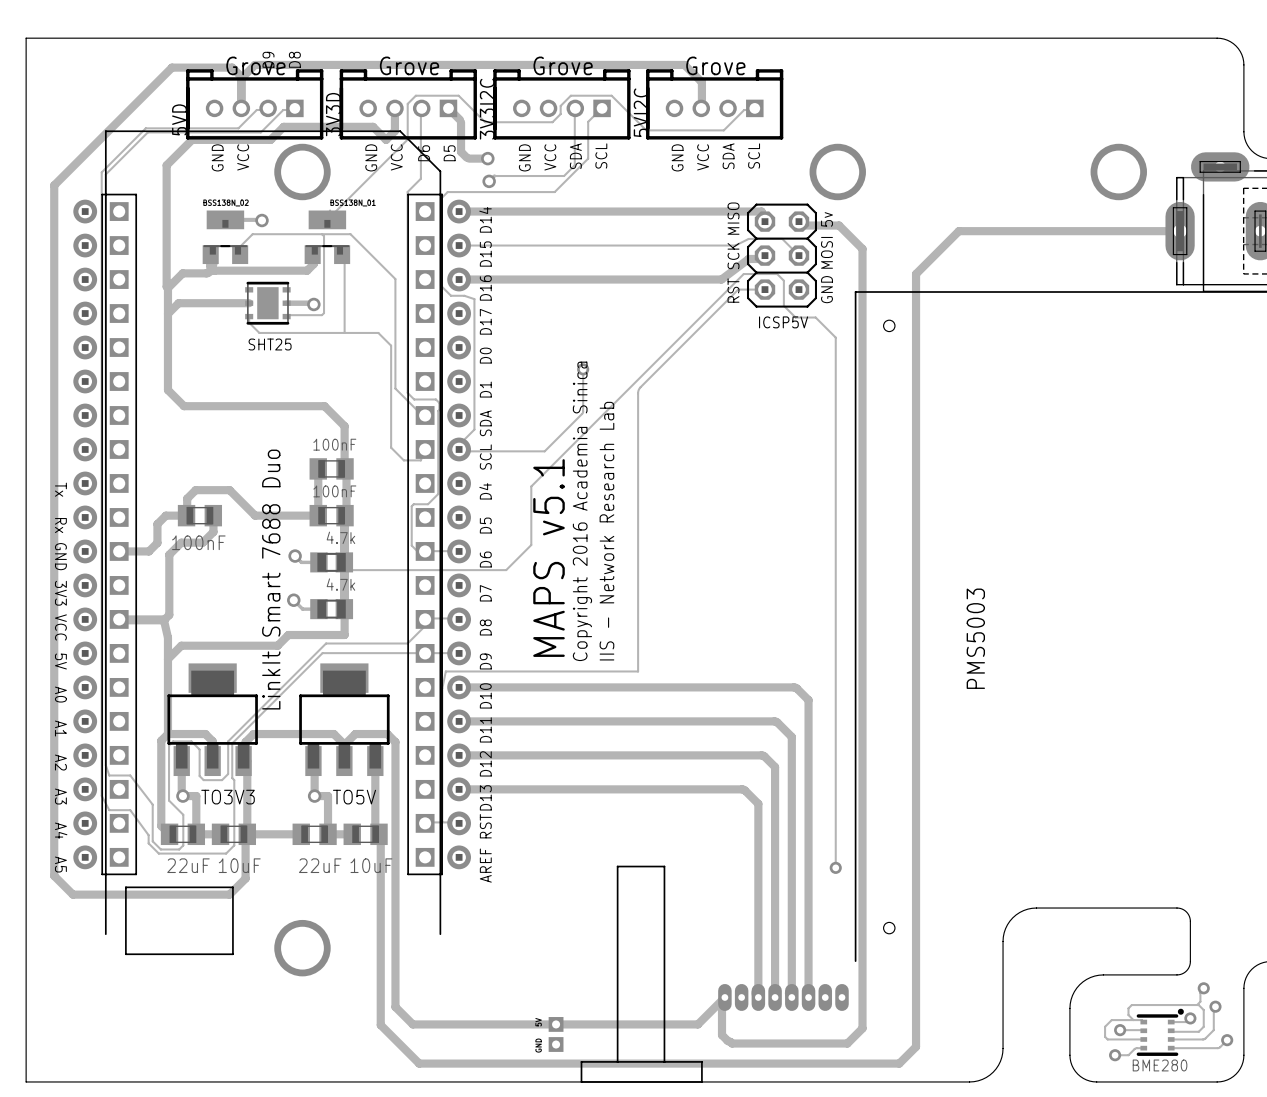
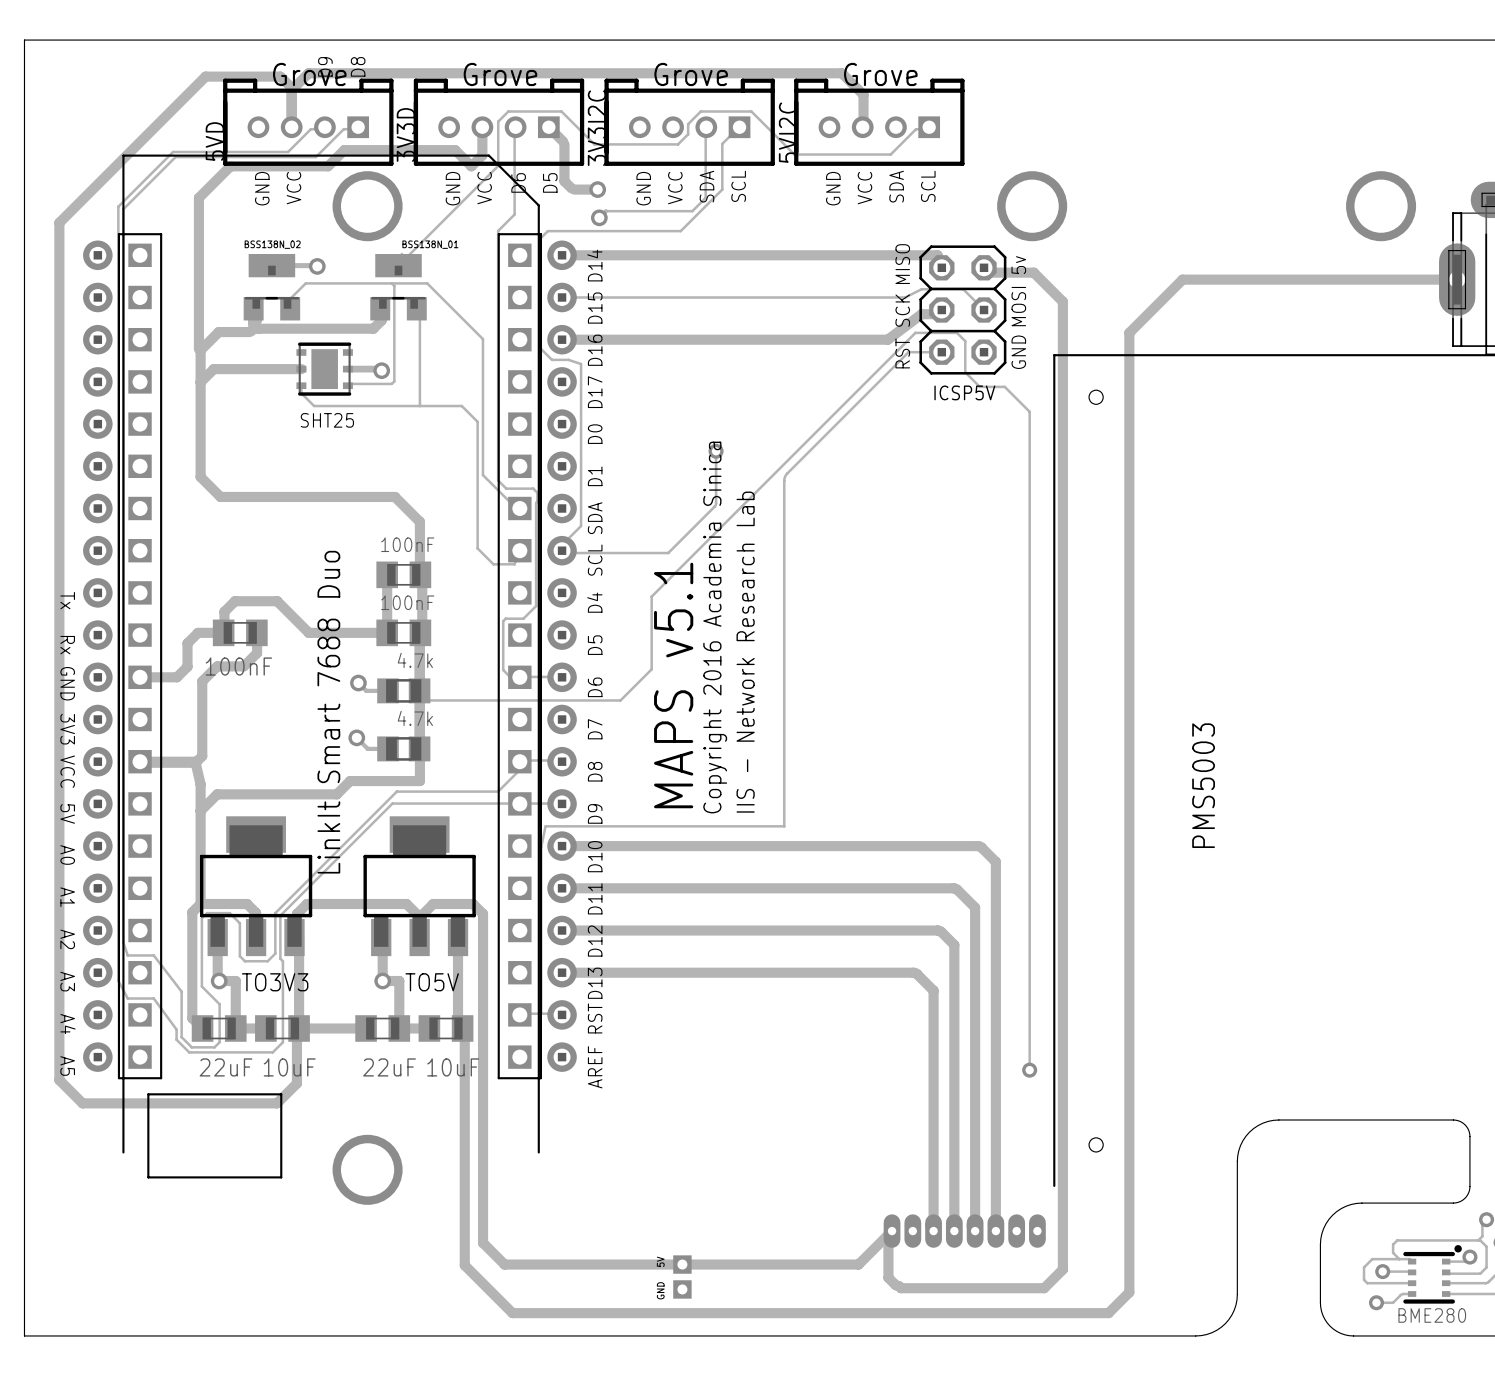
drawing: [580, 865, 703, 1083] -> none

